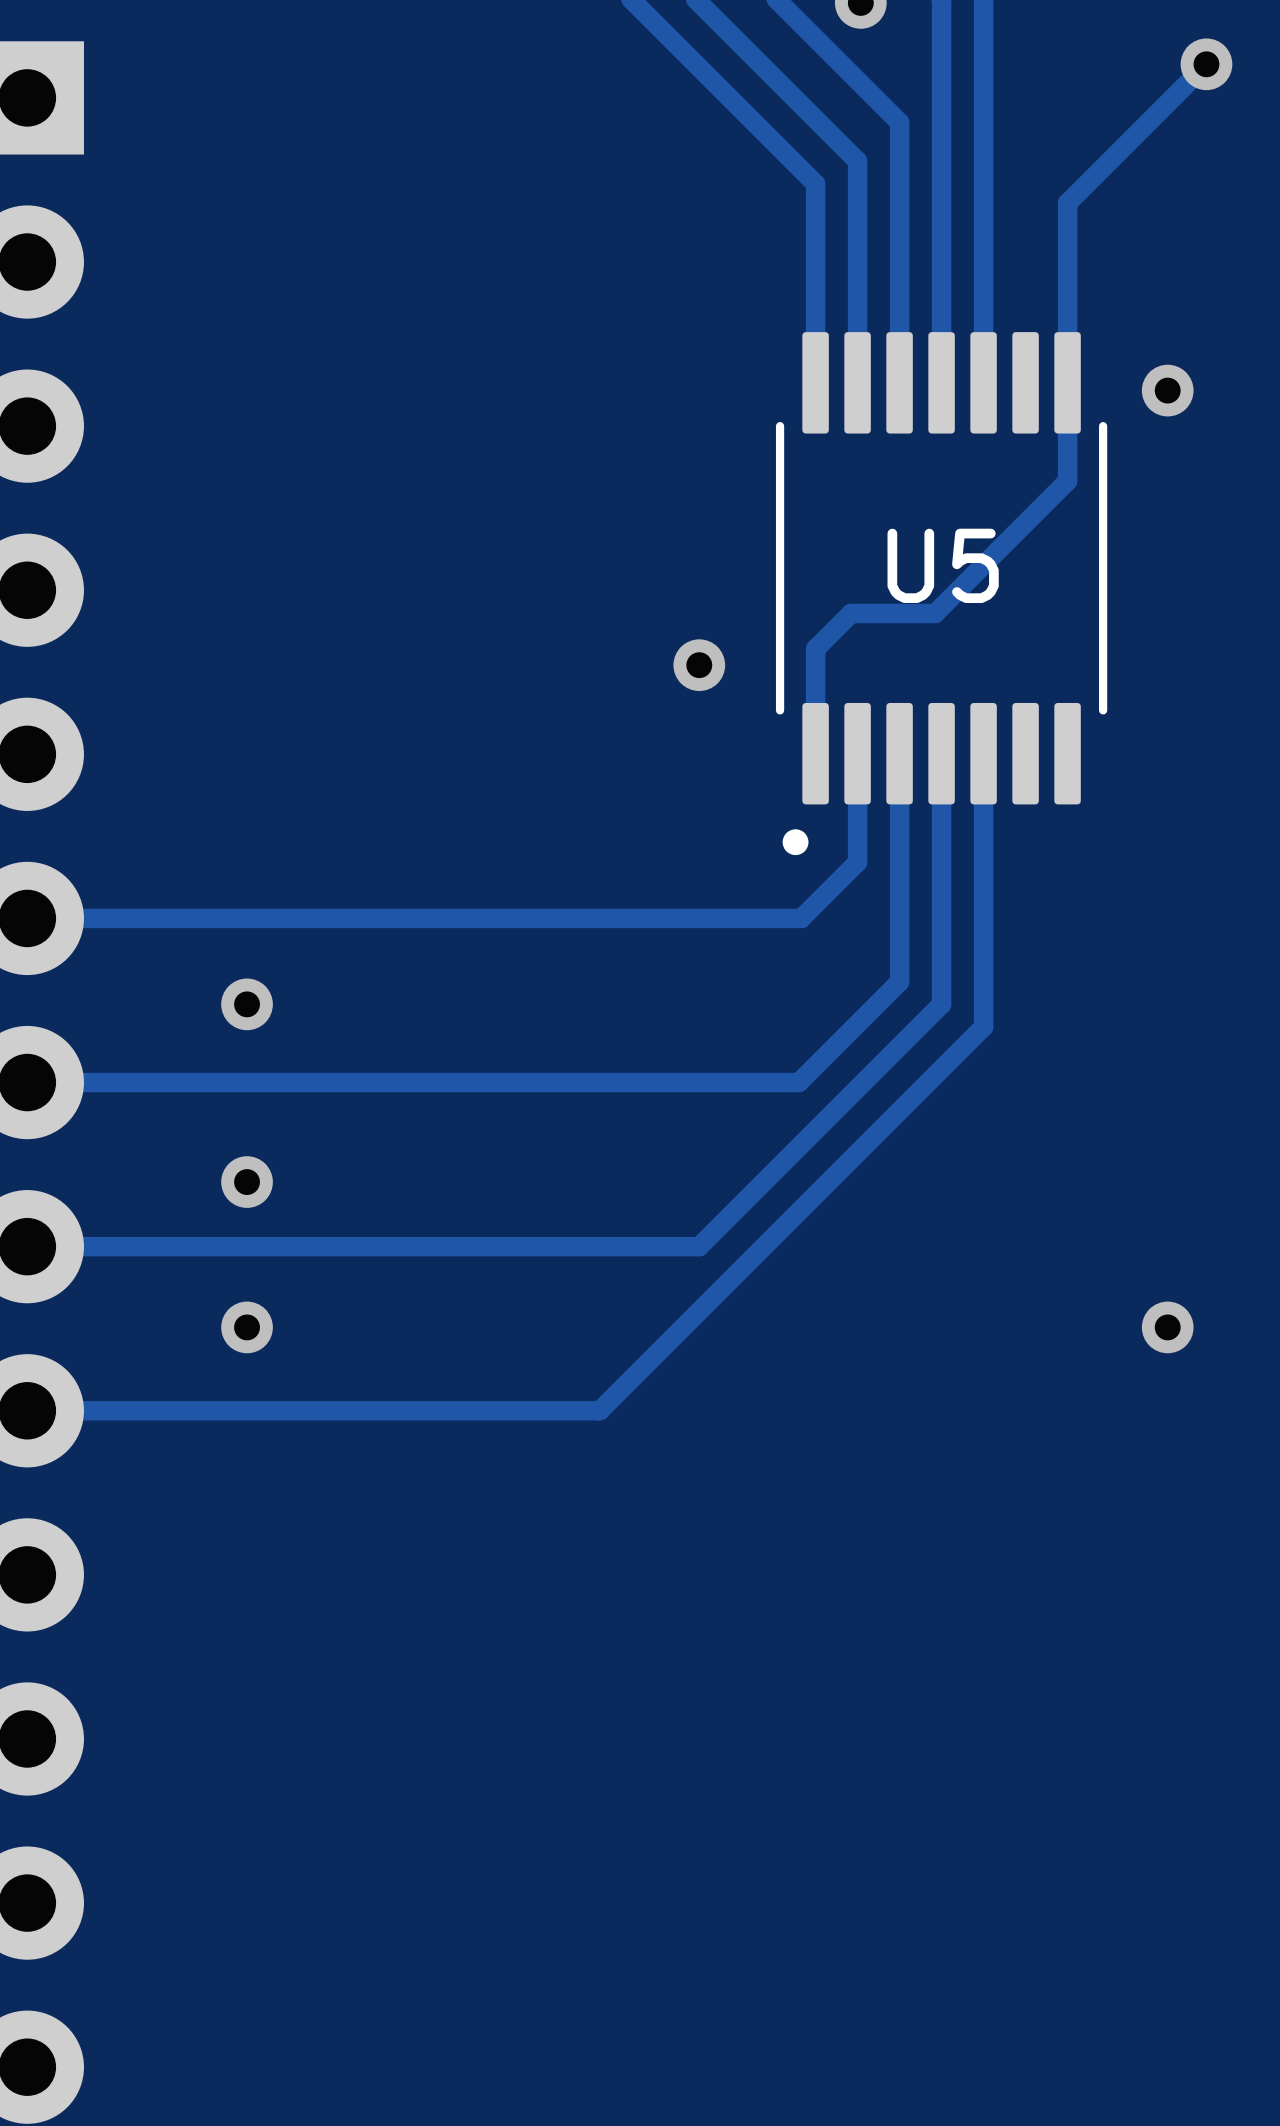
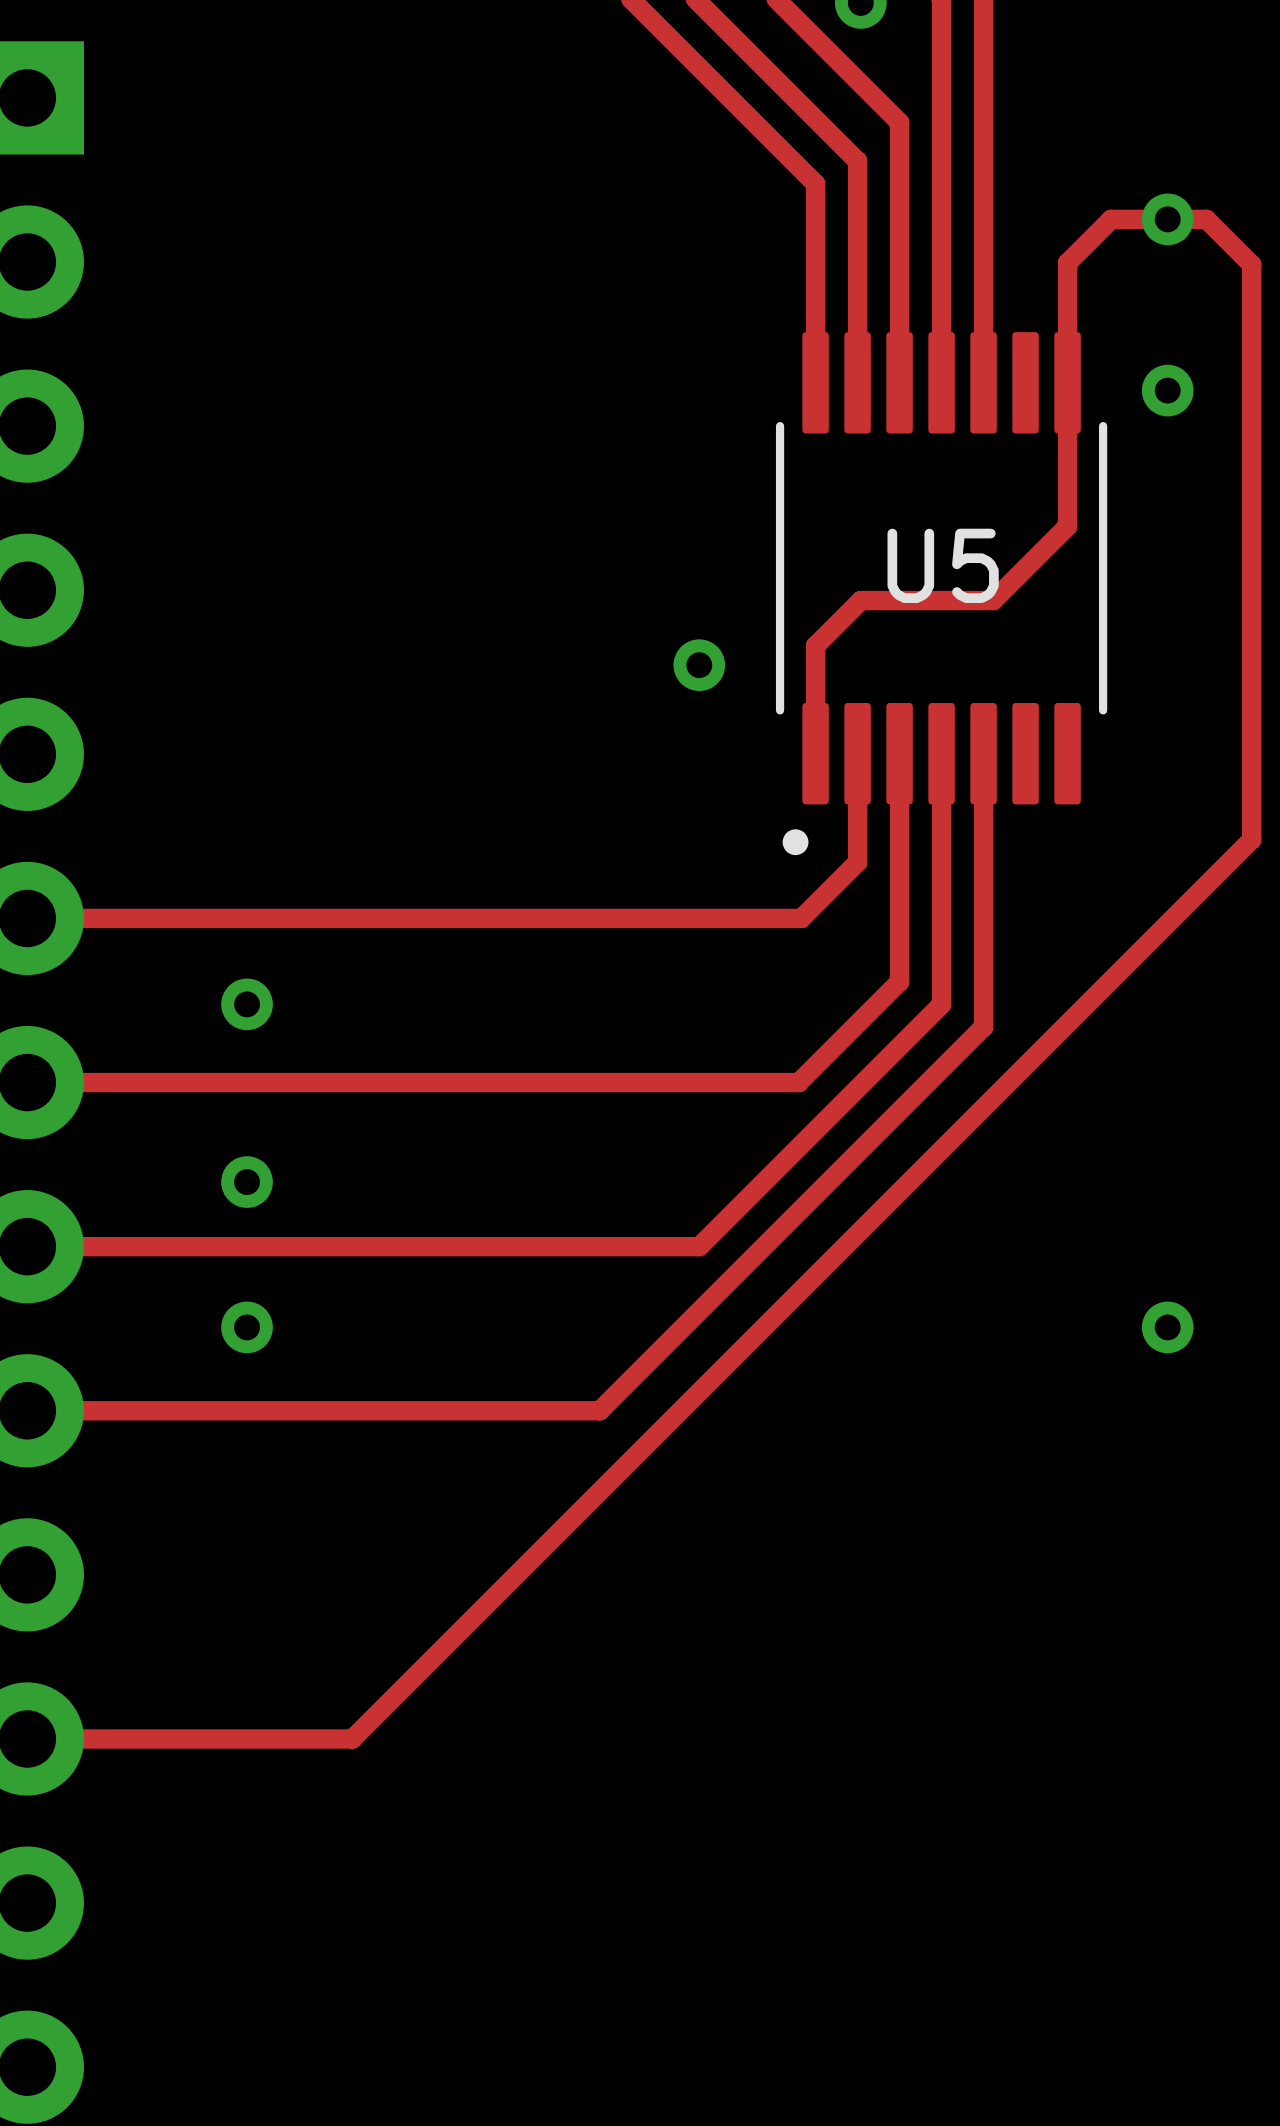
track: (1206, 64) (1067, 203) (1067, 262) -> (27, 1738) (352, 1738) (1251, 839) (1251, 264) (1206, 219) (1111, 219) (1067, 262)
via position: (1206, 64) -> (1167, 219)
track: (1067, 481) (935, 613) (851, 613) (815, 649) -> (1067, 481) (1067, 526) (993, 600) (860, 600) (815, 645) (815, 649)

